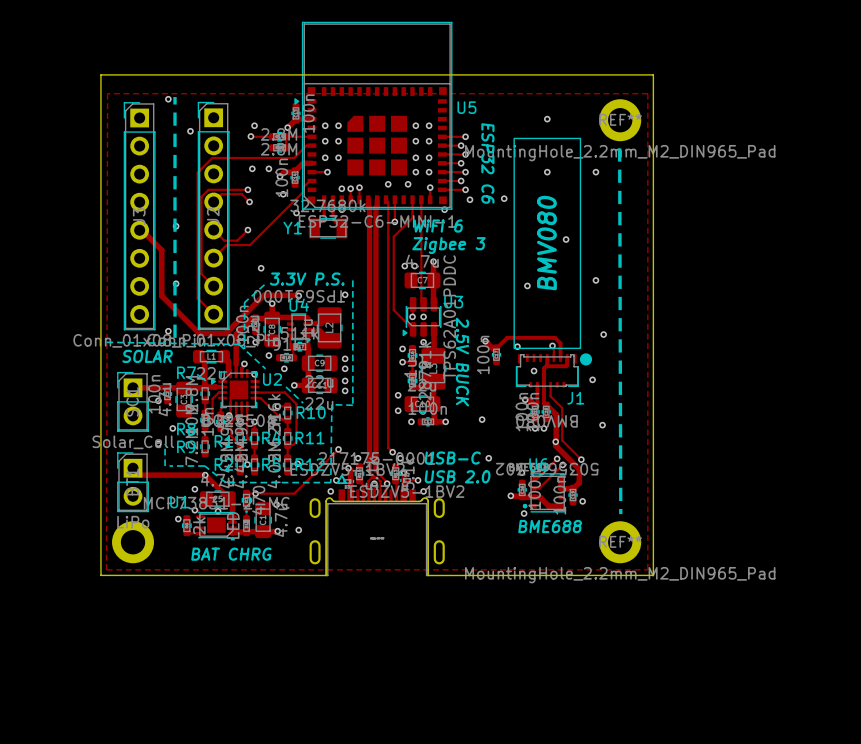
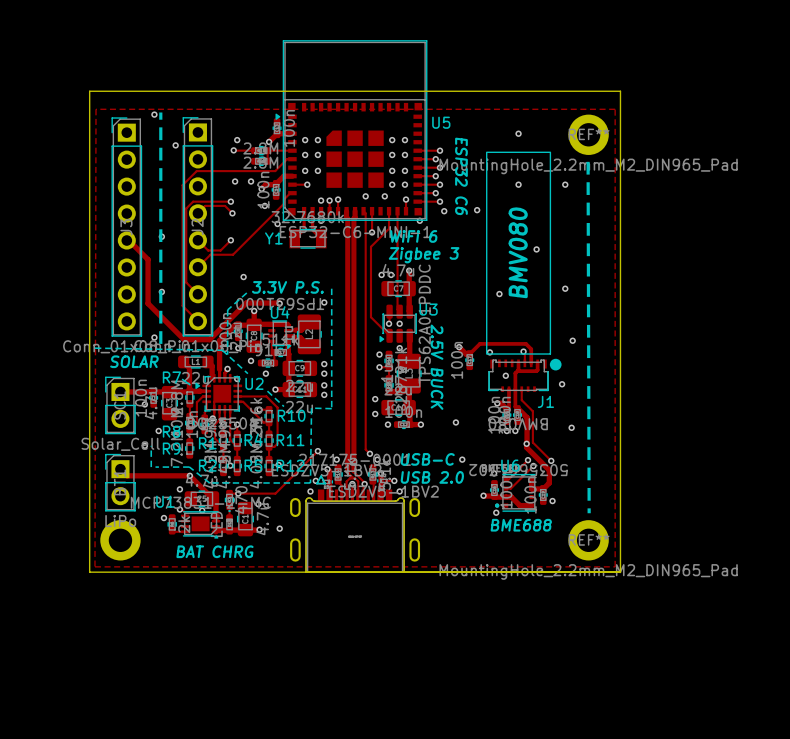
part footprint: [309, 474, 445, 577] -> [290, 475, 421, 573]
board edge: (100, 575) (326, 575) -> (89, 572) (620, 572)

